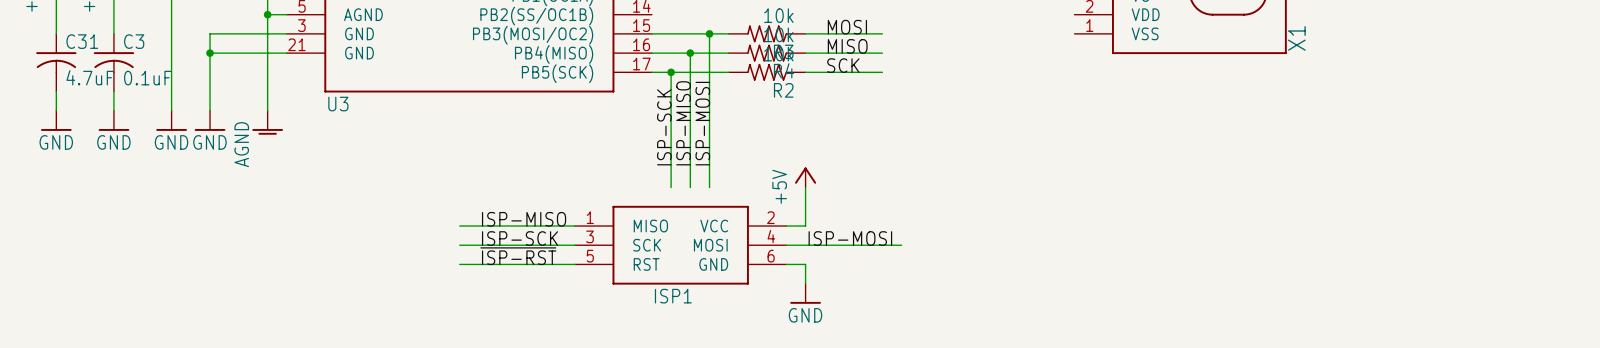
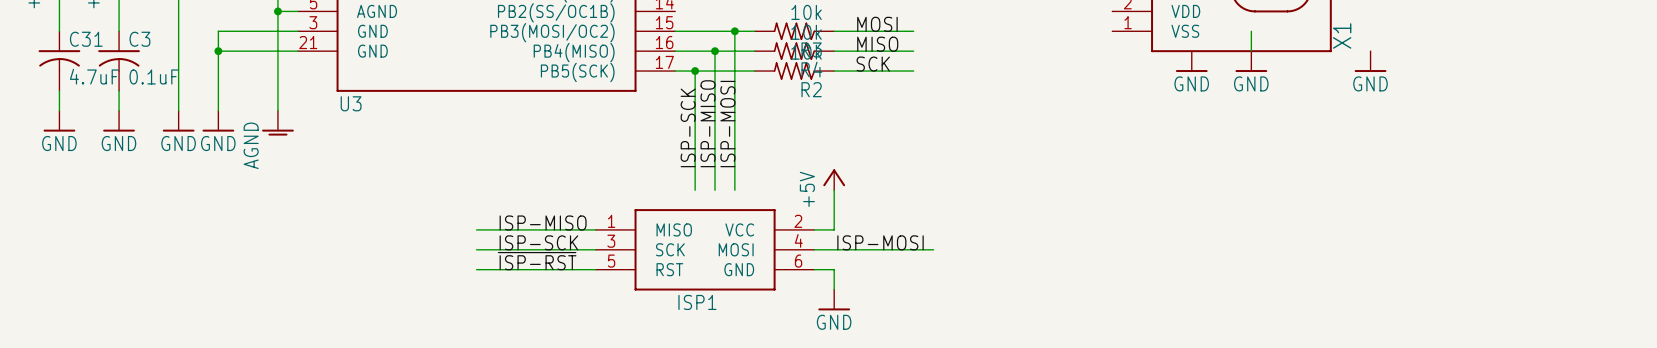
wire: none -> (1251, 31) (1251, 51)
power symbol: none -> GND (1191, 61)
power symbol: none -> GND (1251, 61)
power symbol: none -> GND (1370, 61)

